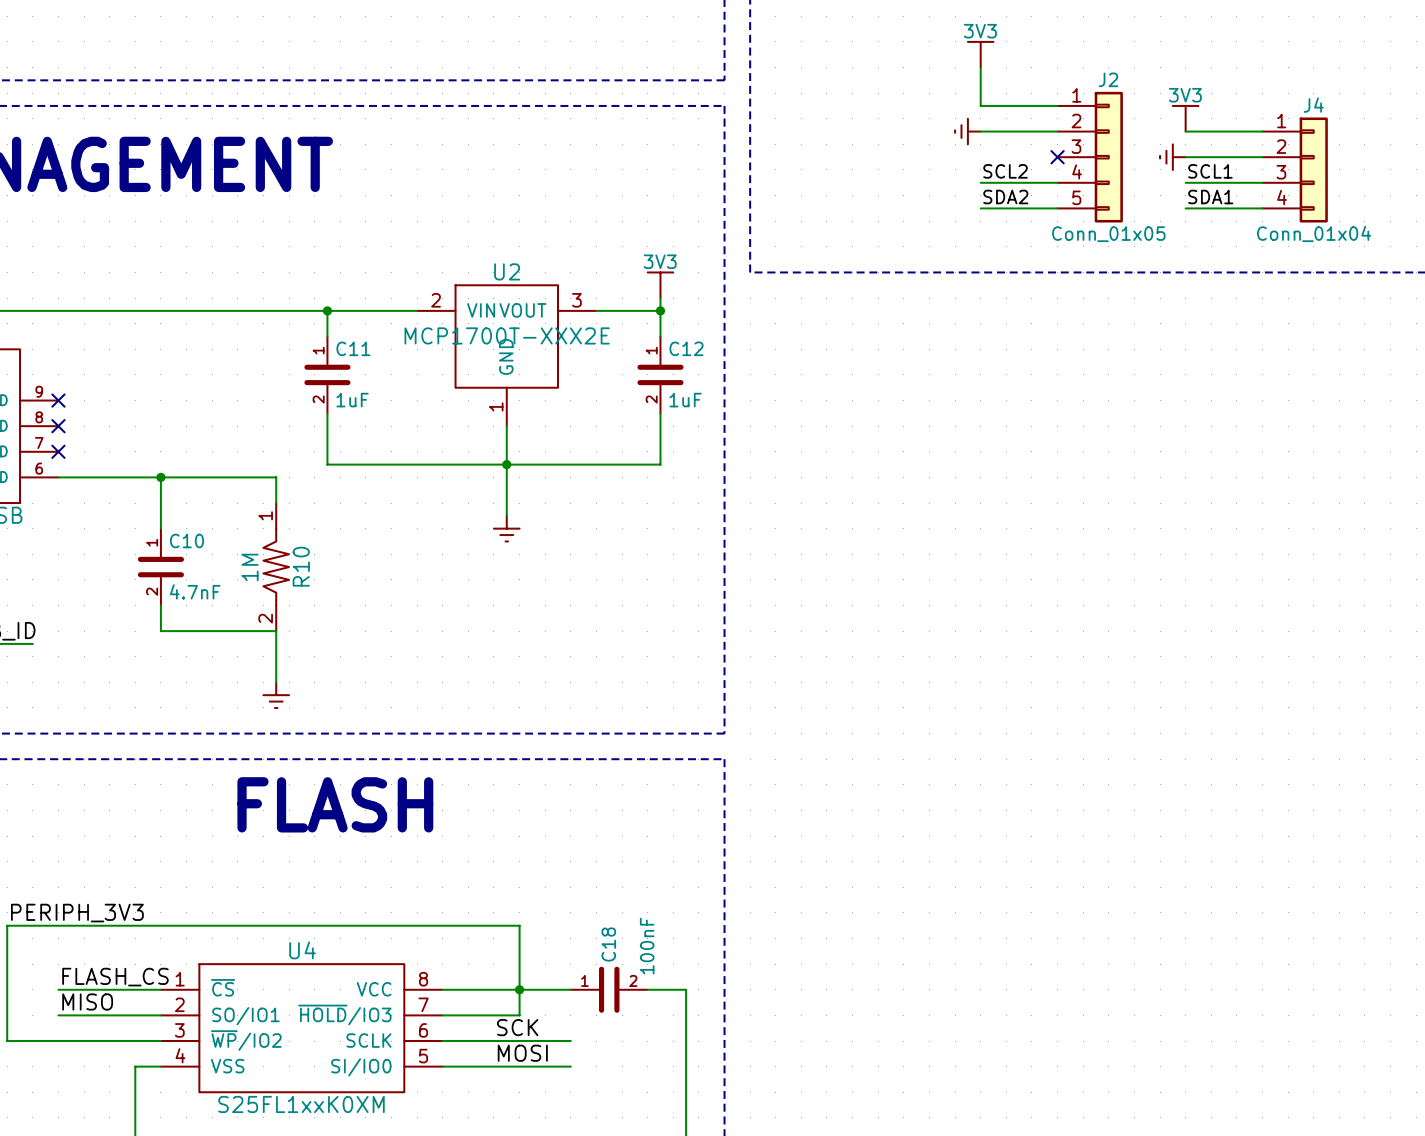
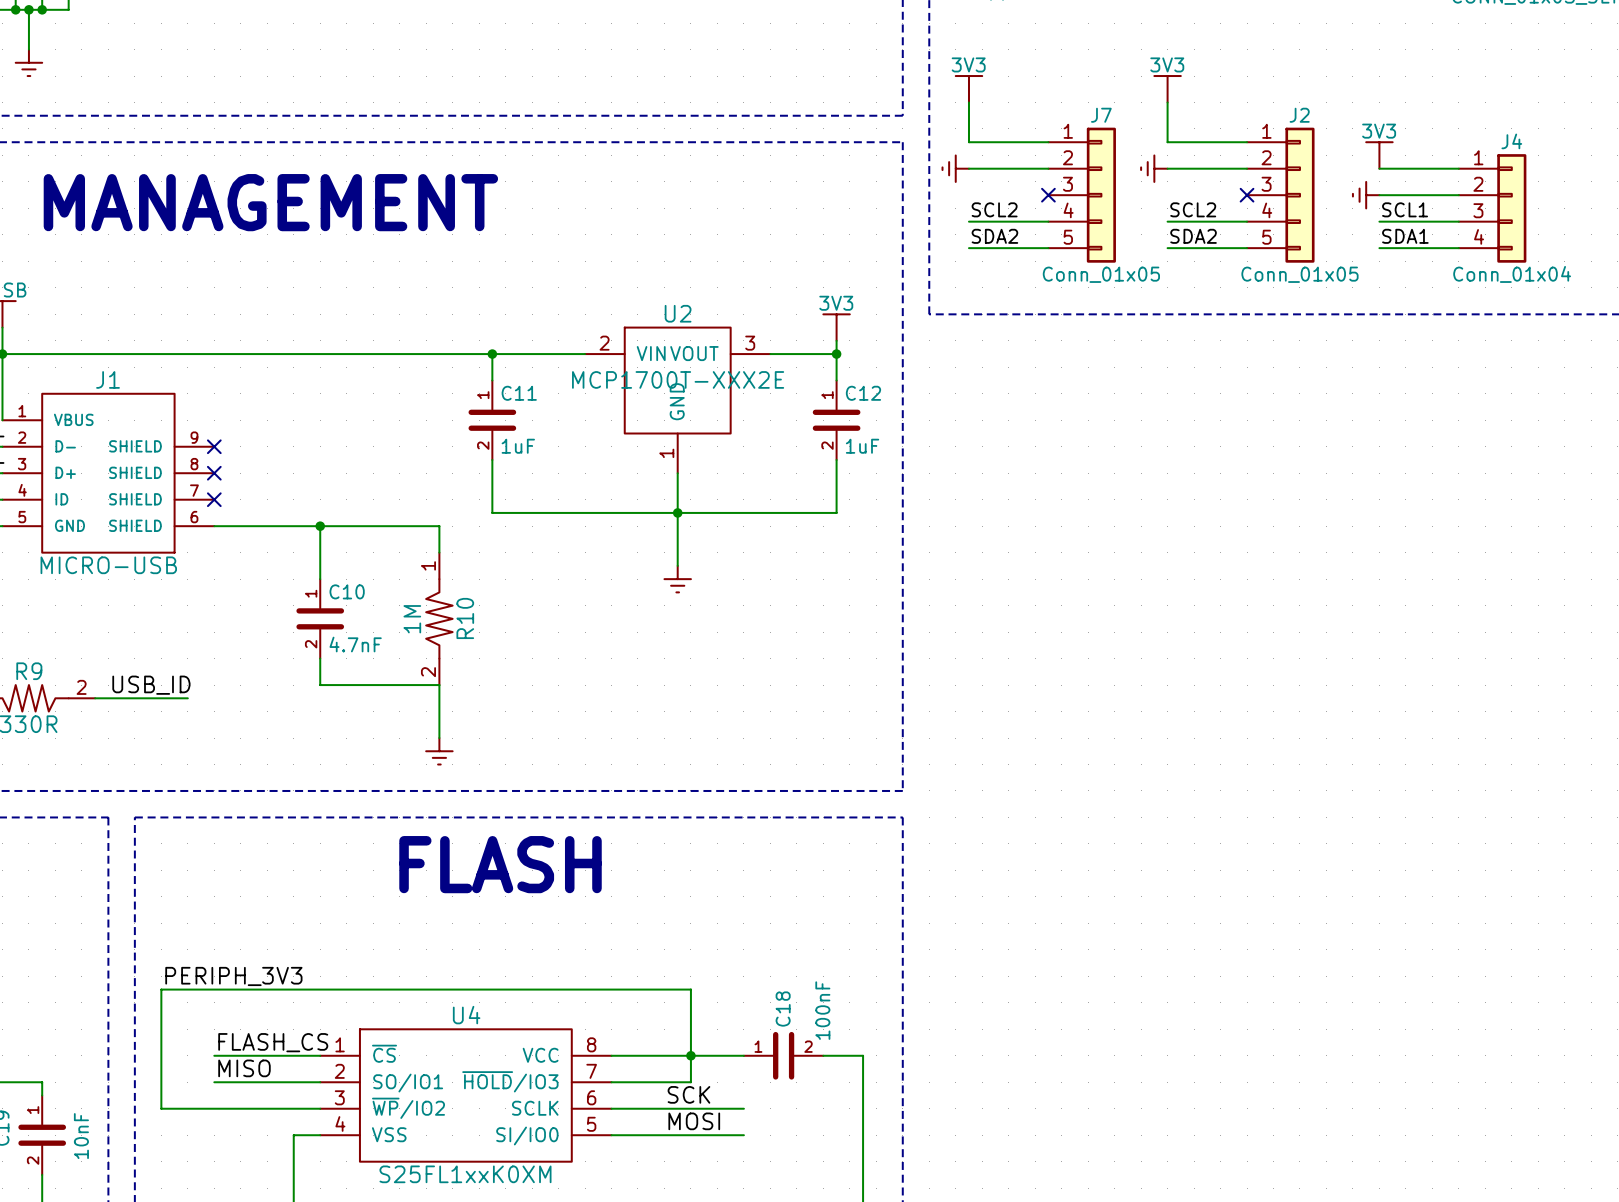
power symbol: none -> 3V3 (968, 89)
wire: none -> (968, 102) (968, 142) (1048, 142)
power symbol: none -> (955, 168)
wire: none -> (968, 168) (1048, 168)
no-connect mark: none -> (1048, 195)
J7: none -> Conn_01x05 (1082, 195)
label: none -> SCL2 (994, 209)
wire: none -> (968, 221) (1048, 221)
label: none -> SDA2 (994, 236)
wire: none -> (968, 248) (1048, 248)

